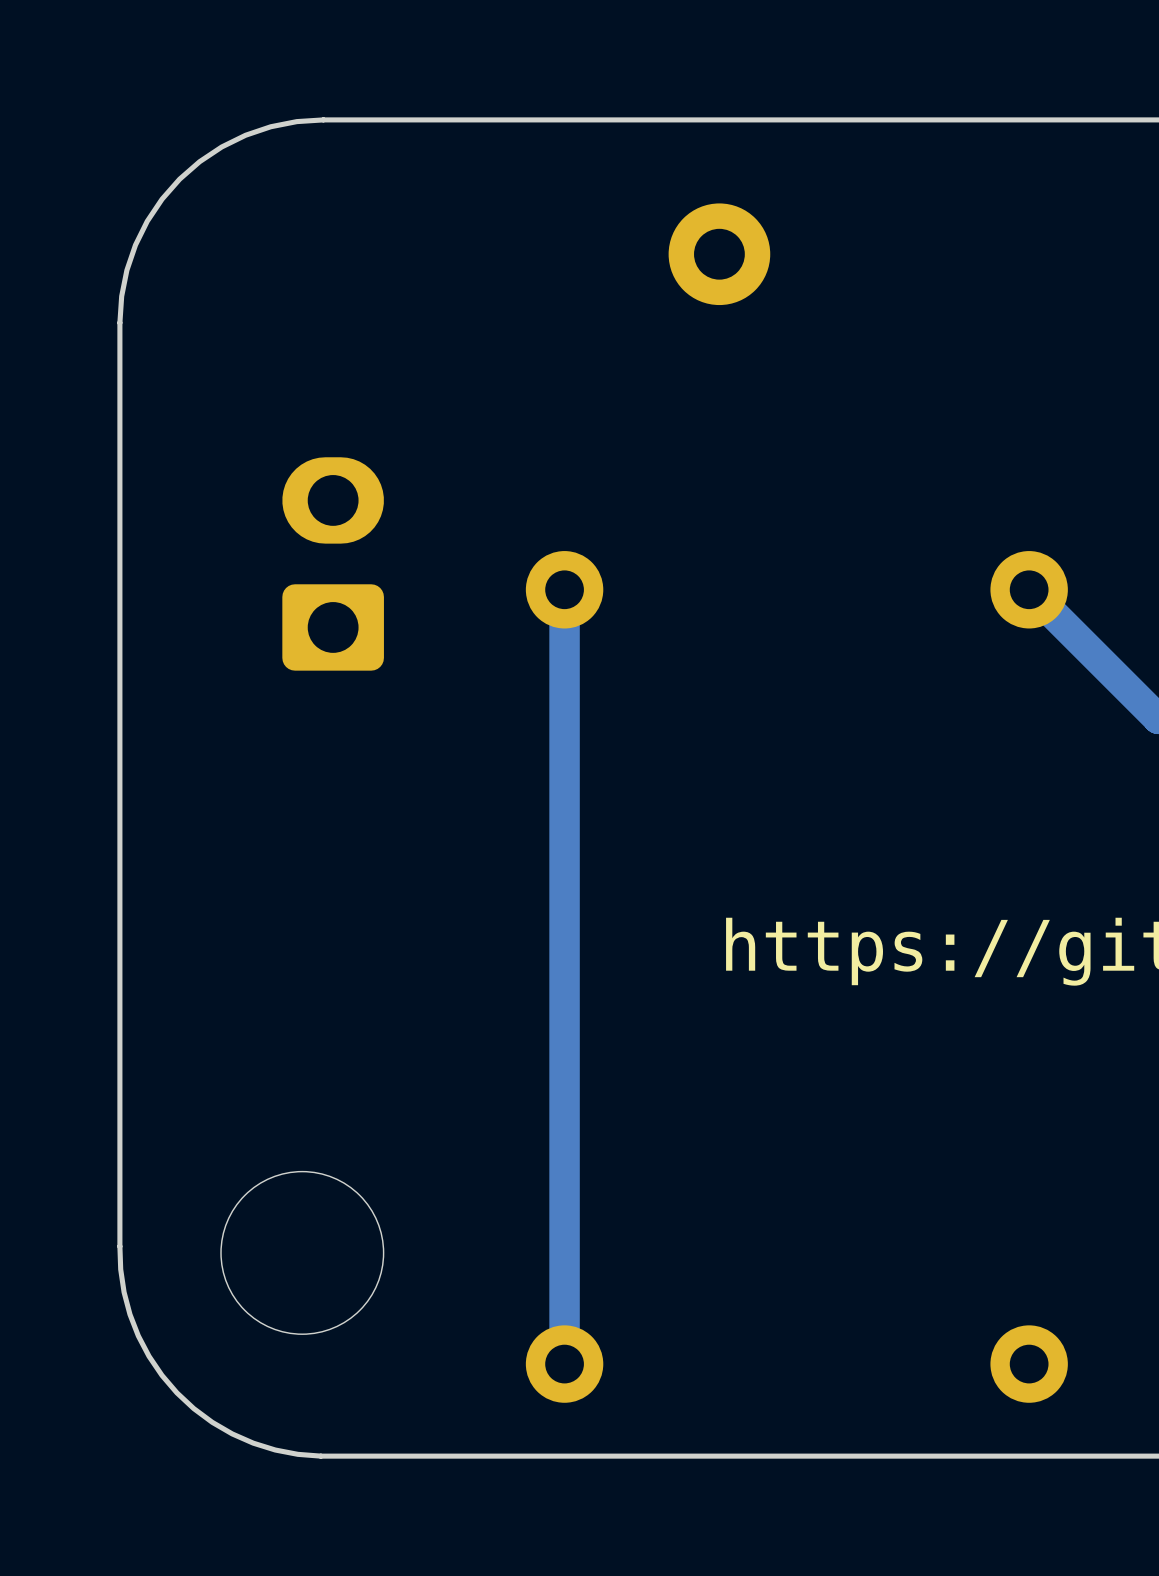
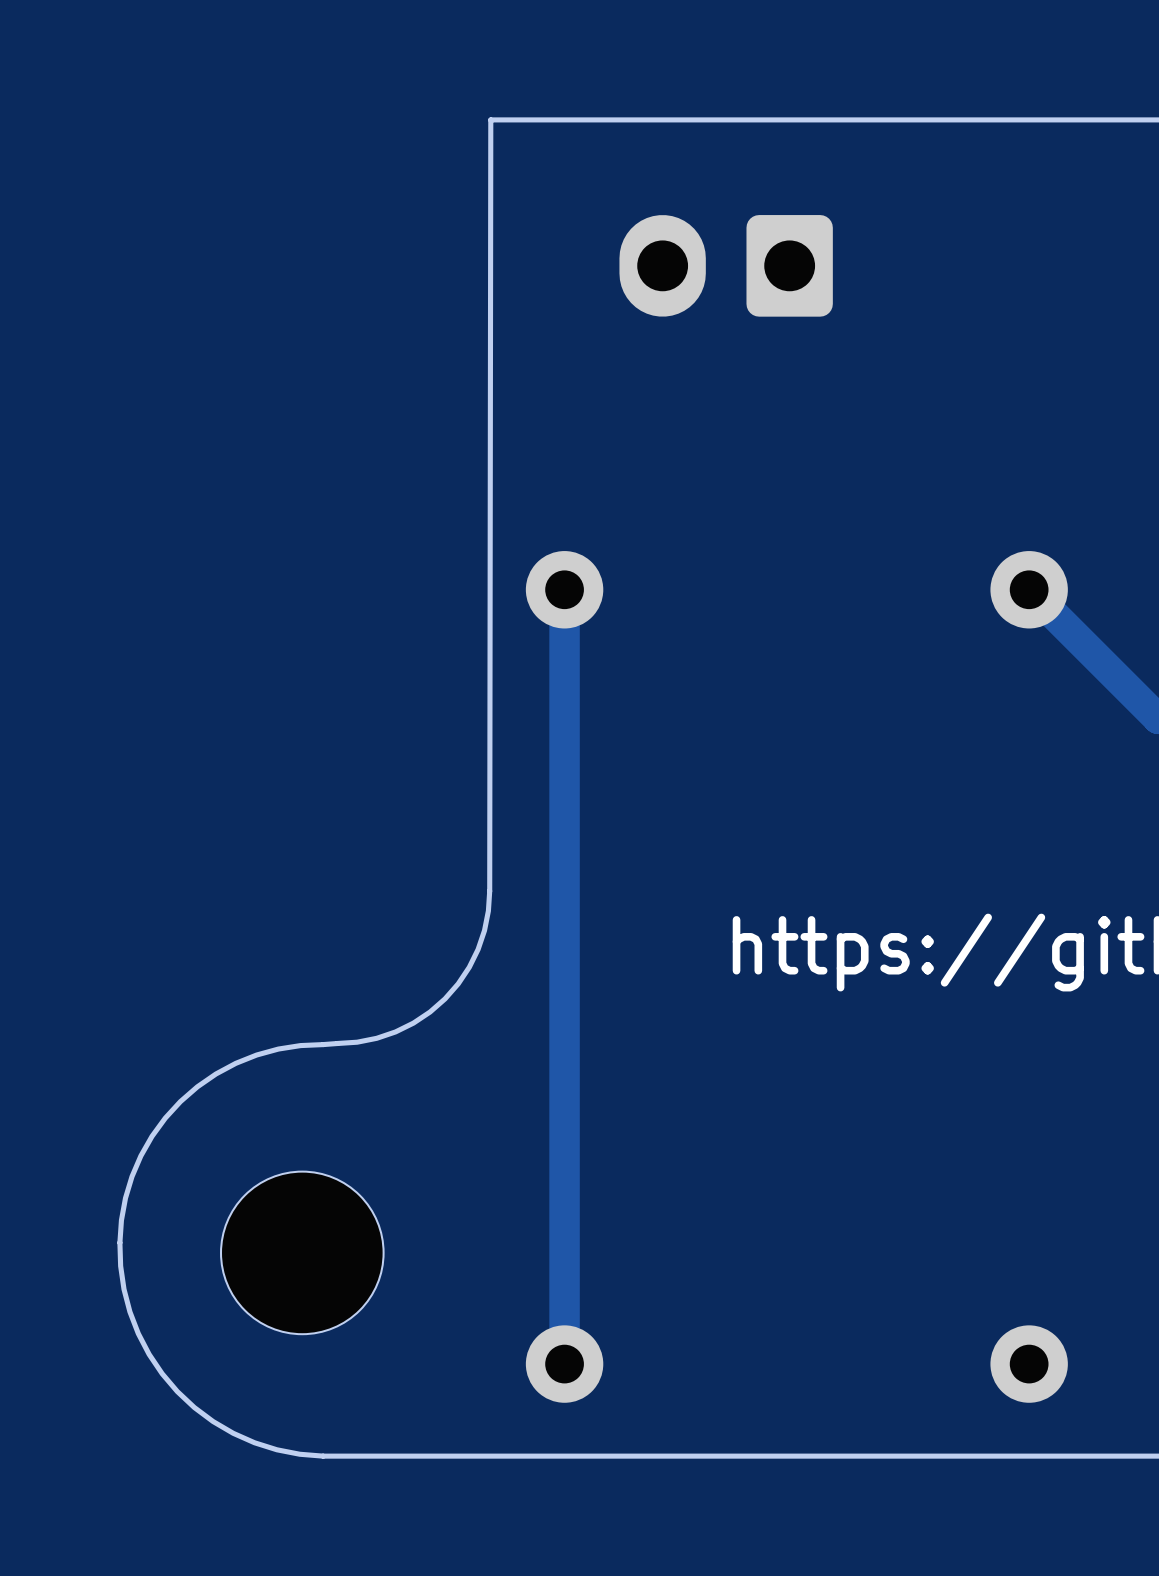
board edge: (490, 119) (323, 119) (296, 121) (270, 126) (245, 135) (221, 146) (199, 161) (179, 179) (162, 199) (147, 221) (135, 245) (126, 270) (121, 296) (119, 322) (119, 1246) (124, 1292) (129, 1314) (149, 1356) (176, 1392) (193, 1408) (212, 1422) (253, 1443) (297, 1454) (323, 1456) -> (490, 119) (489, 891) (484, 930) (478, 949) (458, 983) (430, 1012) (413, 1023) (376, 1038) (357, 1042) (300, 1045) (256, 1055) (215, 1074) (197, 1086) (165, 1118) (140, 1155) (125, 1198) (121, 1220) (120, 1266) (129, 1311) (149, 1354) (177, 1391) (213, 1421) (233, 1433) (276, 1449) (323, 1456)
part footprint: [668, 203, 771, 306] -> [619, 215, 833, 317]
part: (333, 563) -> none

